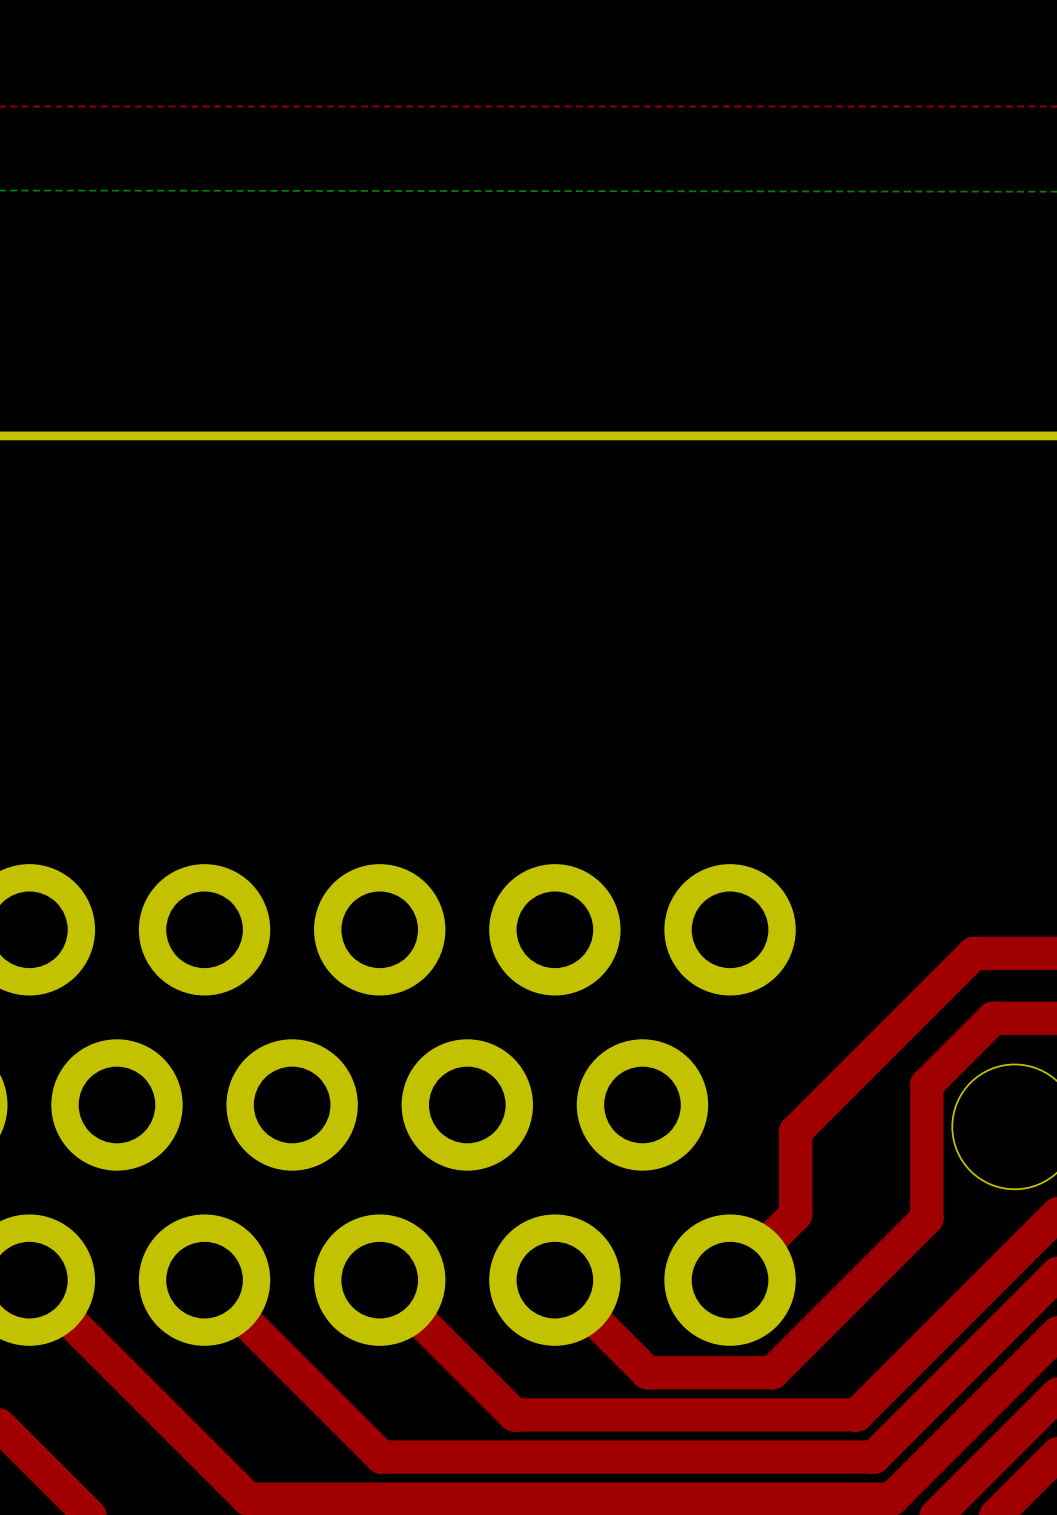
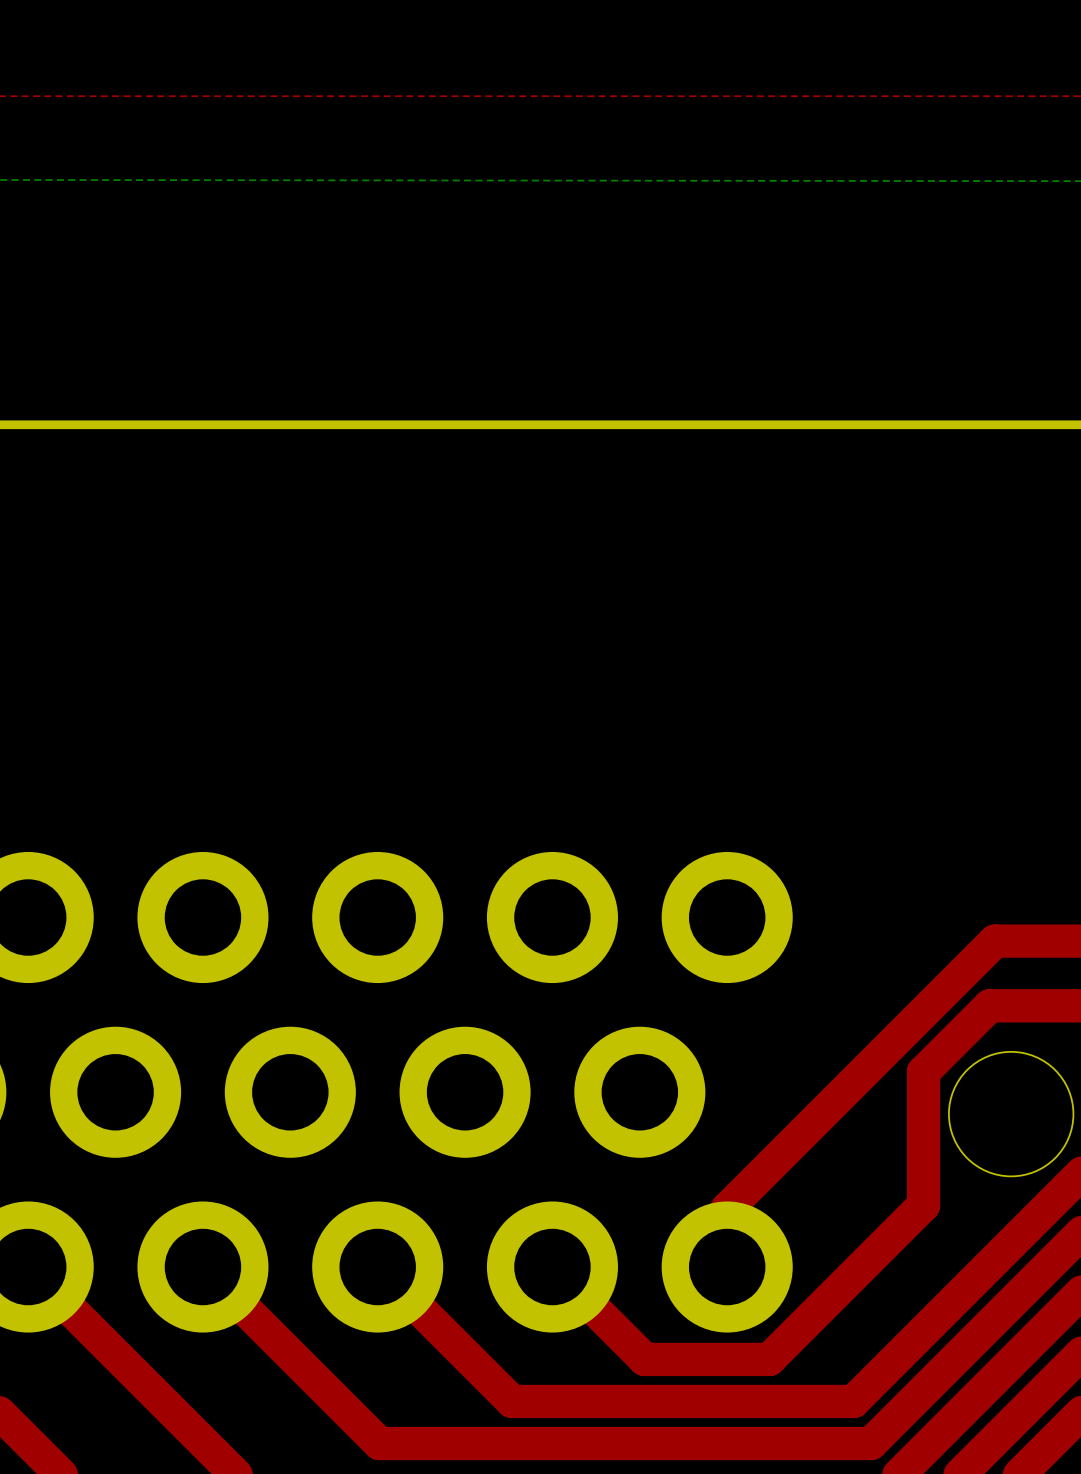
top track: (998, 953) (973, 953) (795, 1131) (795, 1214) (730, 1280) -> (995, 941) (727, 1208) (727, 1267)

